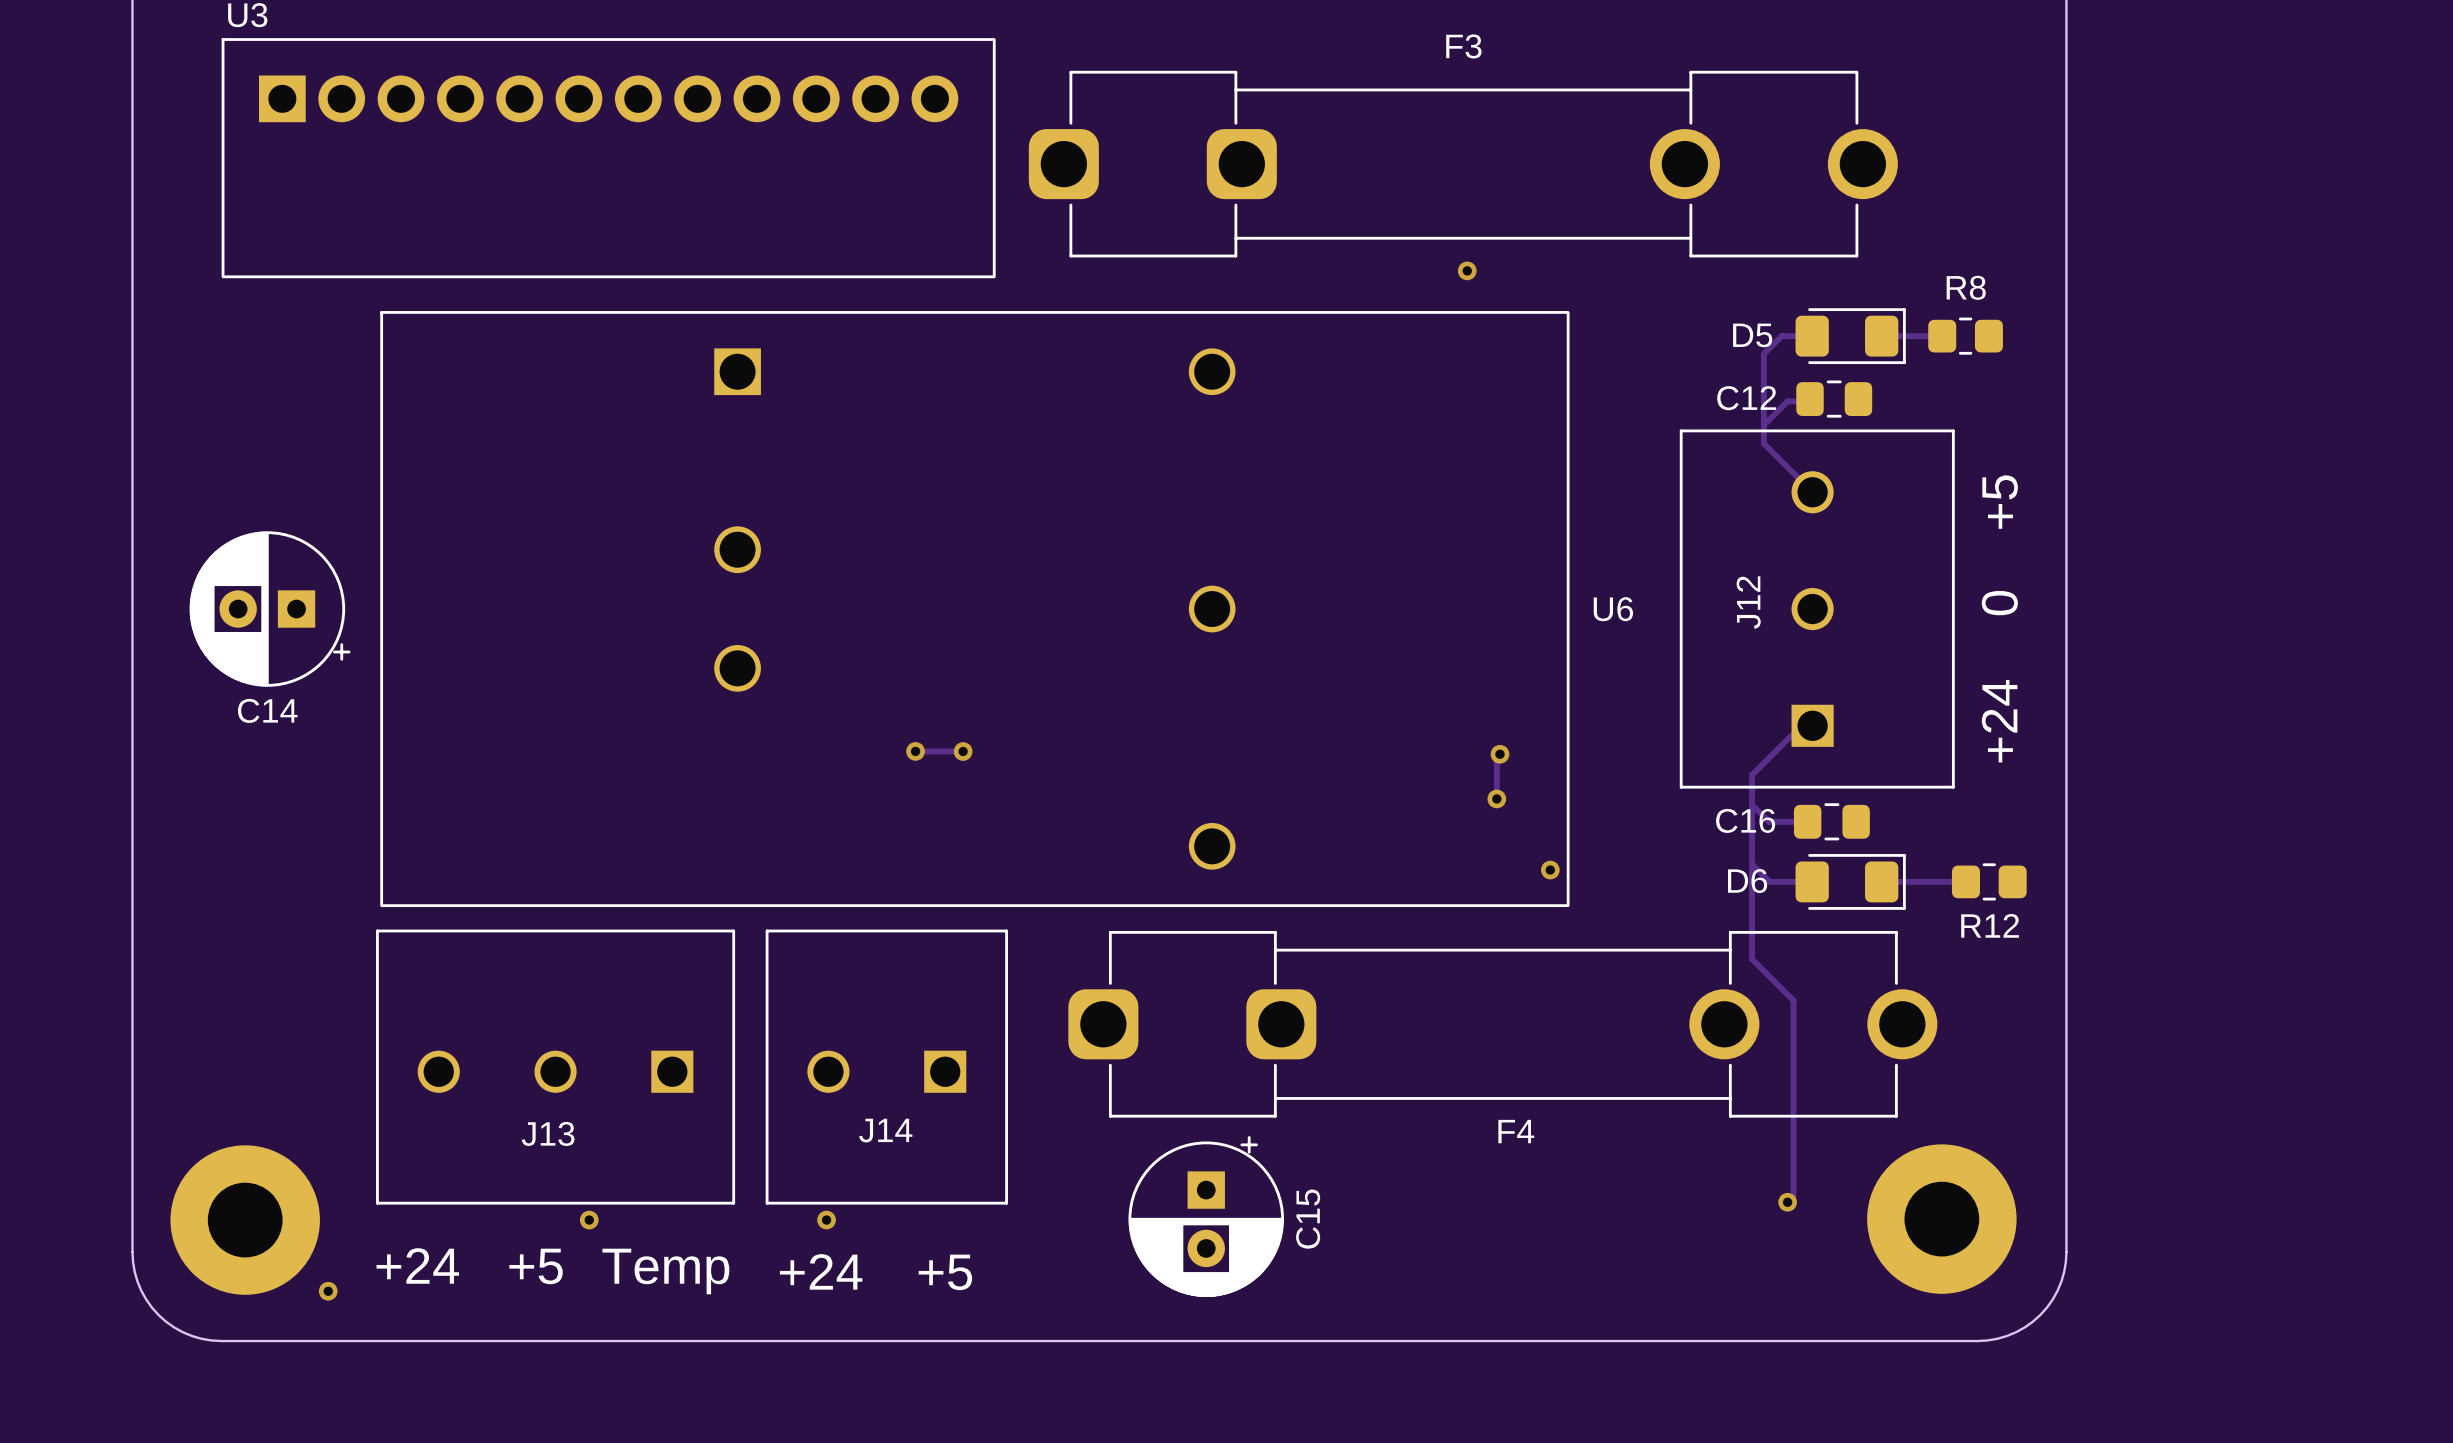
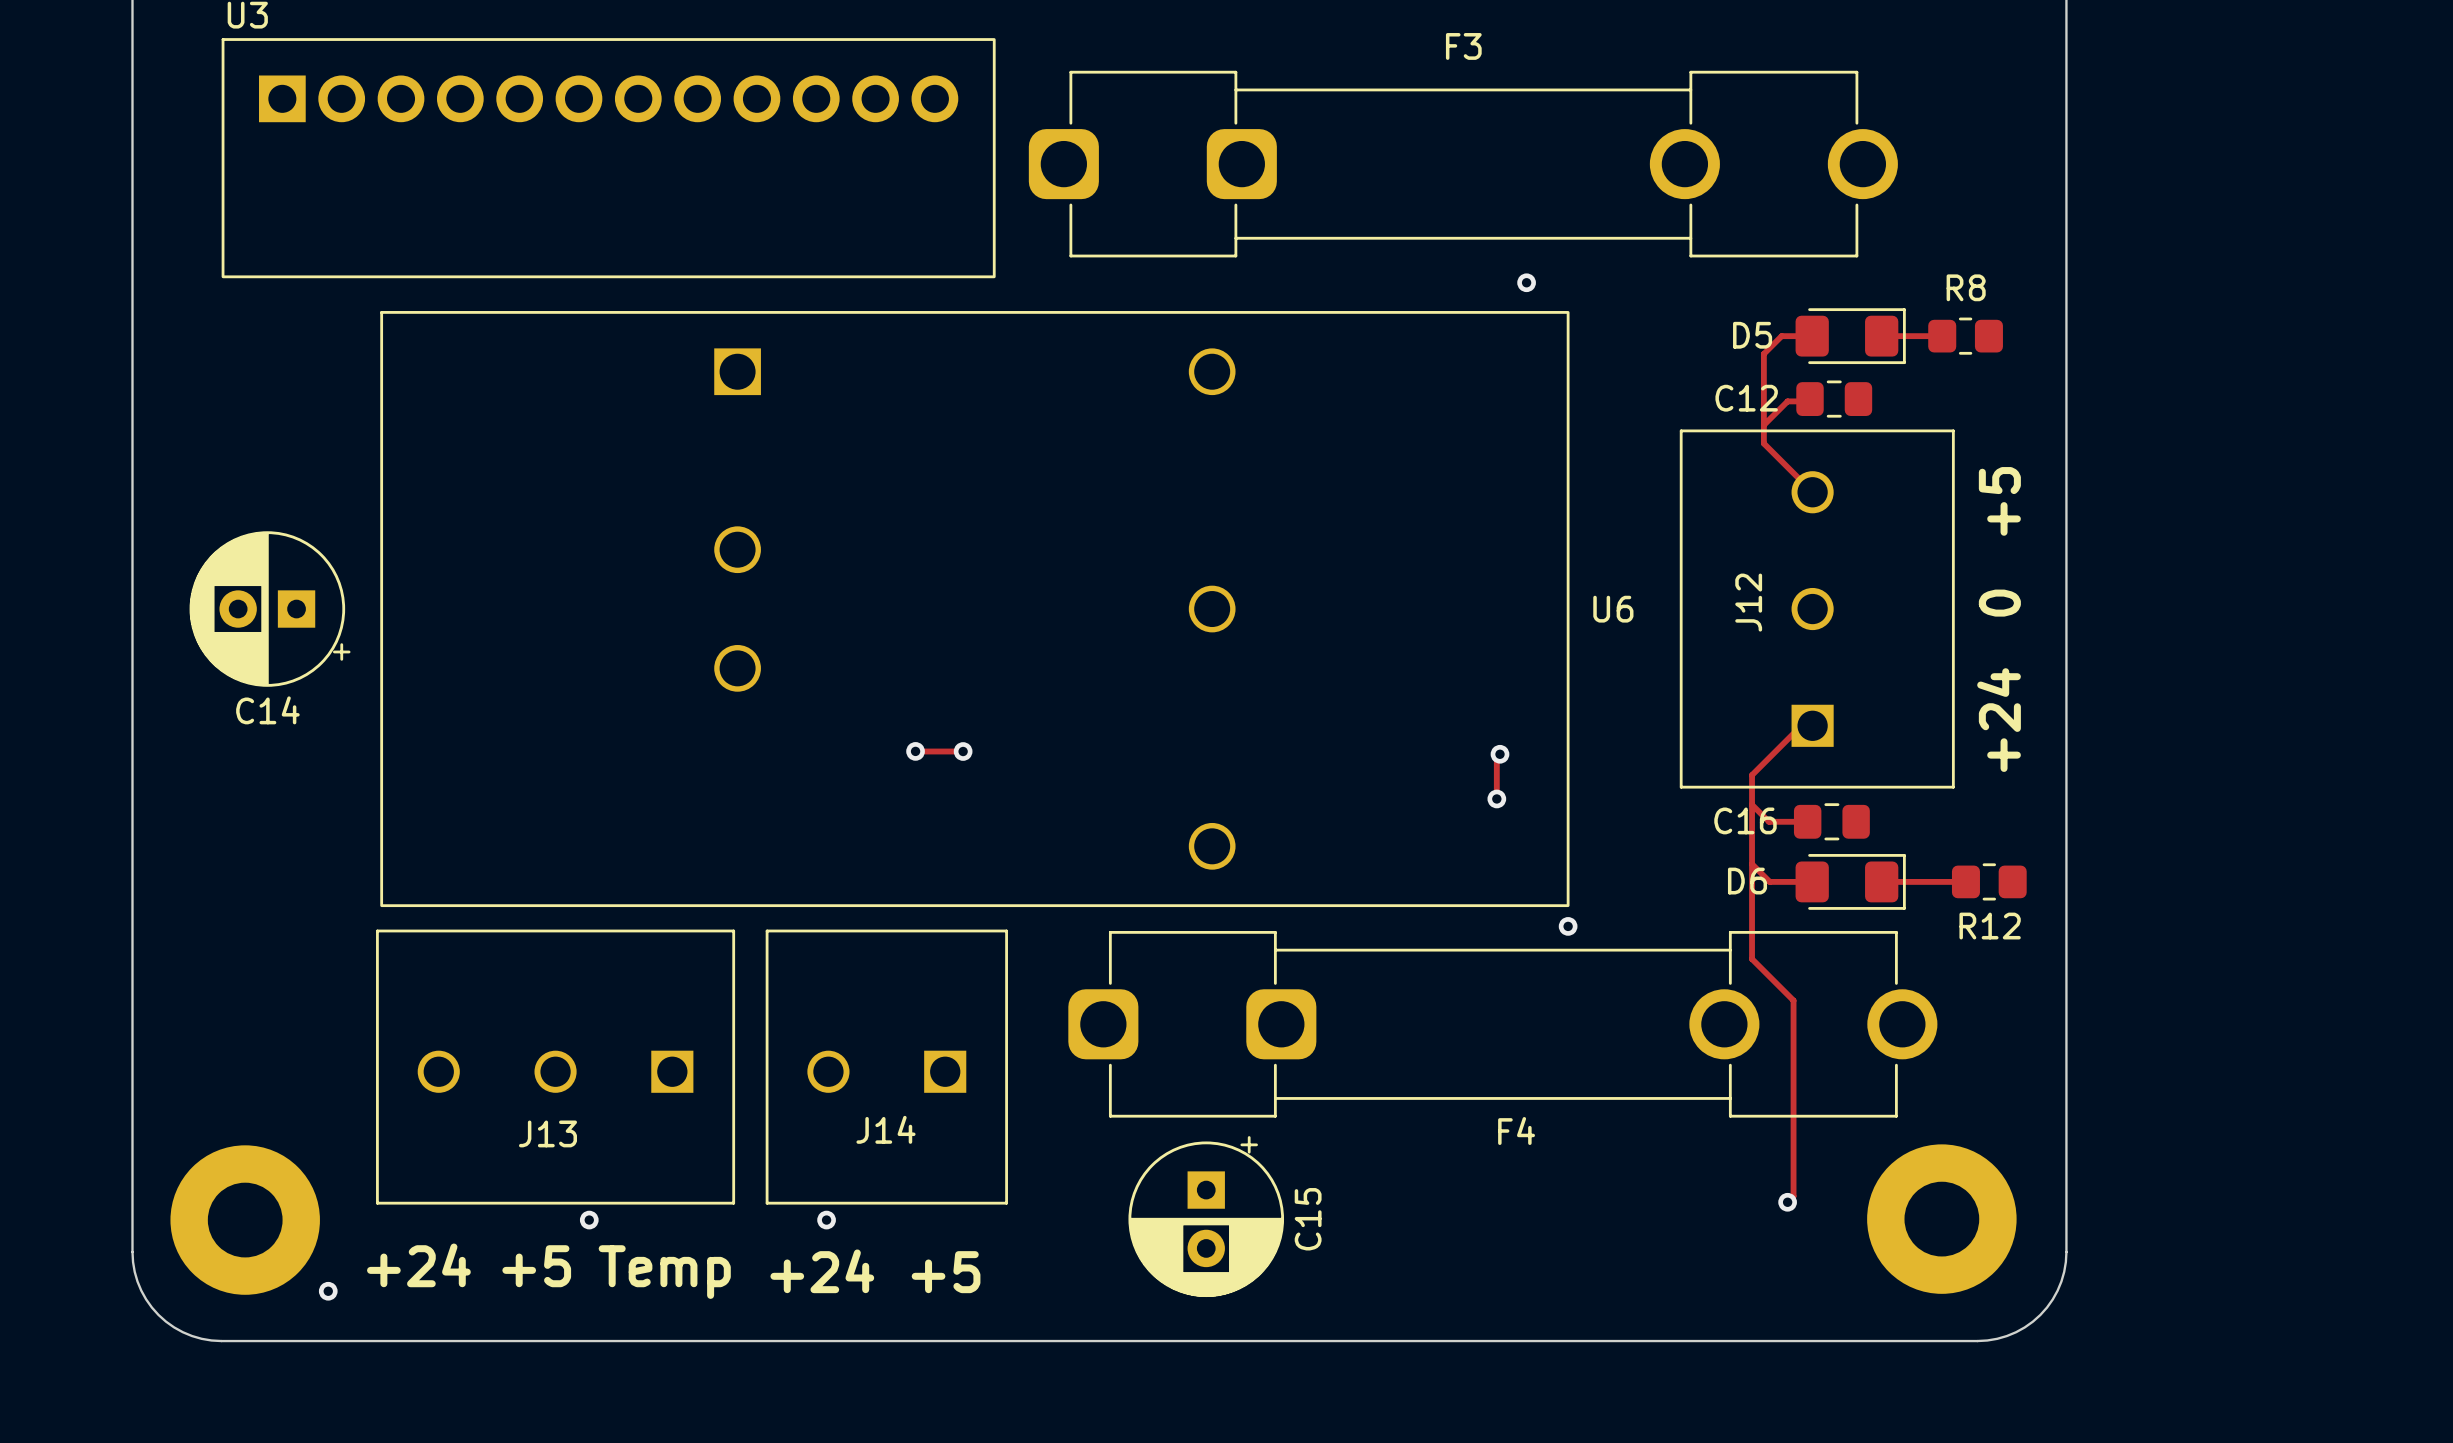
via position: (1467, 270) -> (1526, 282)
via position: (1550, 870) -> (1568, 926)

